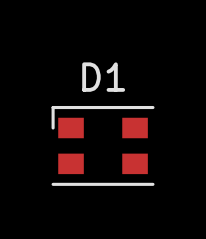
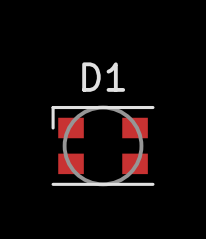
D1 footprint: [51, 105, 155, 186] -> [51, 105, 155, 187]

